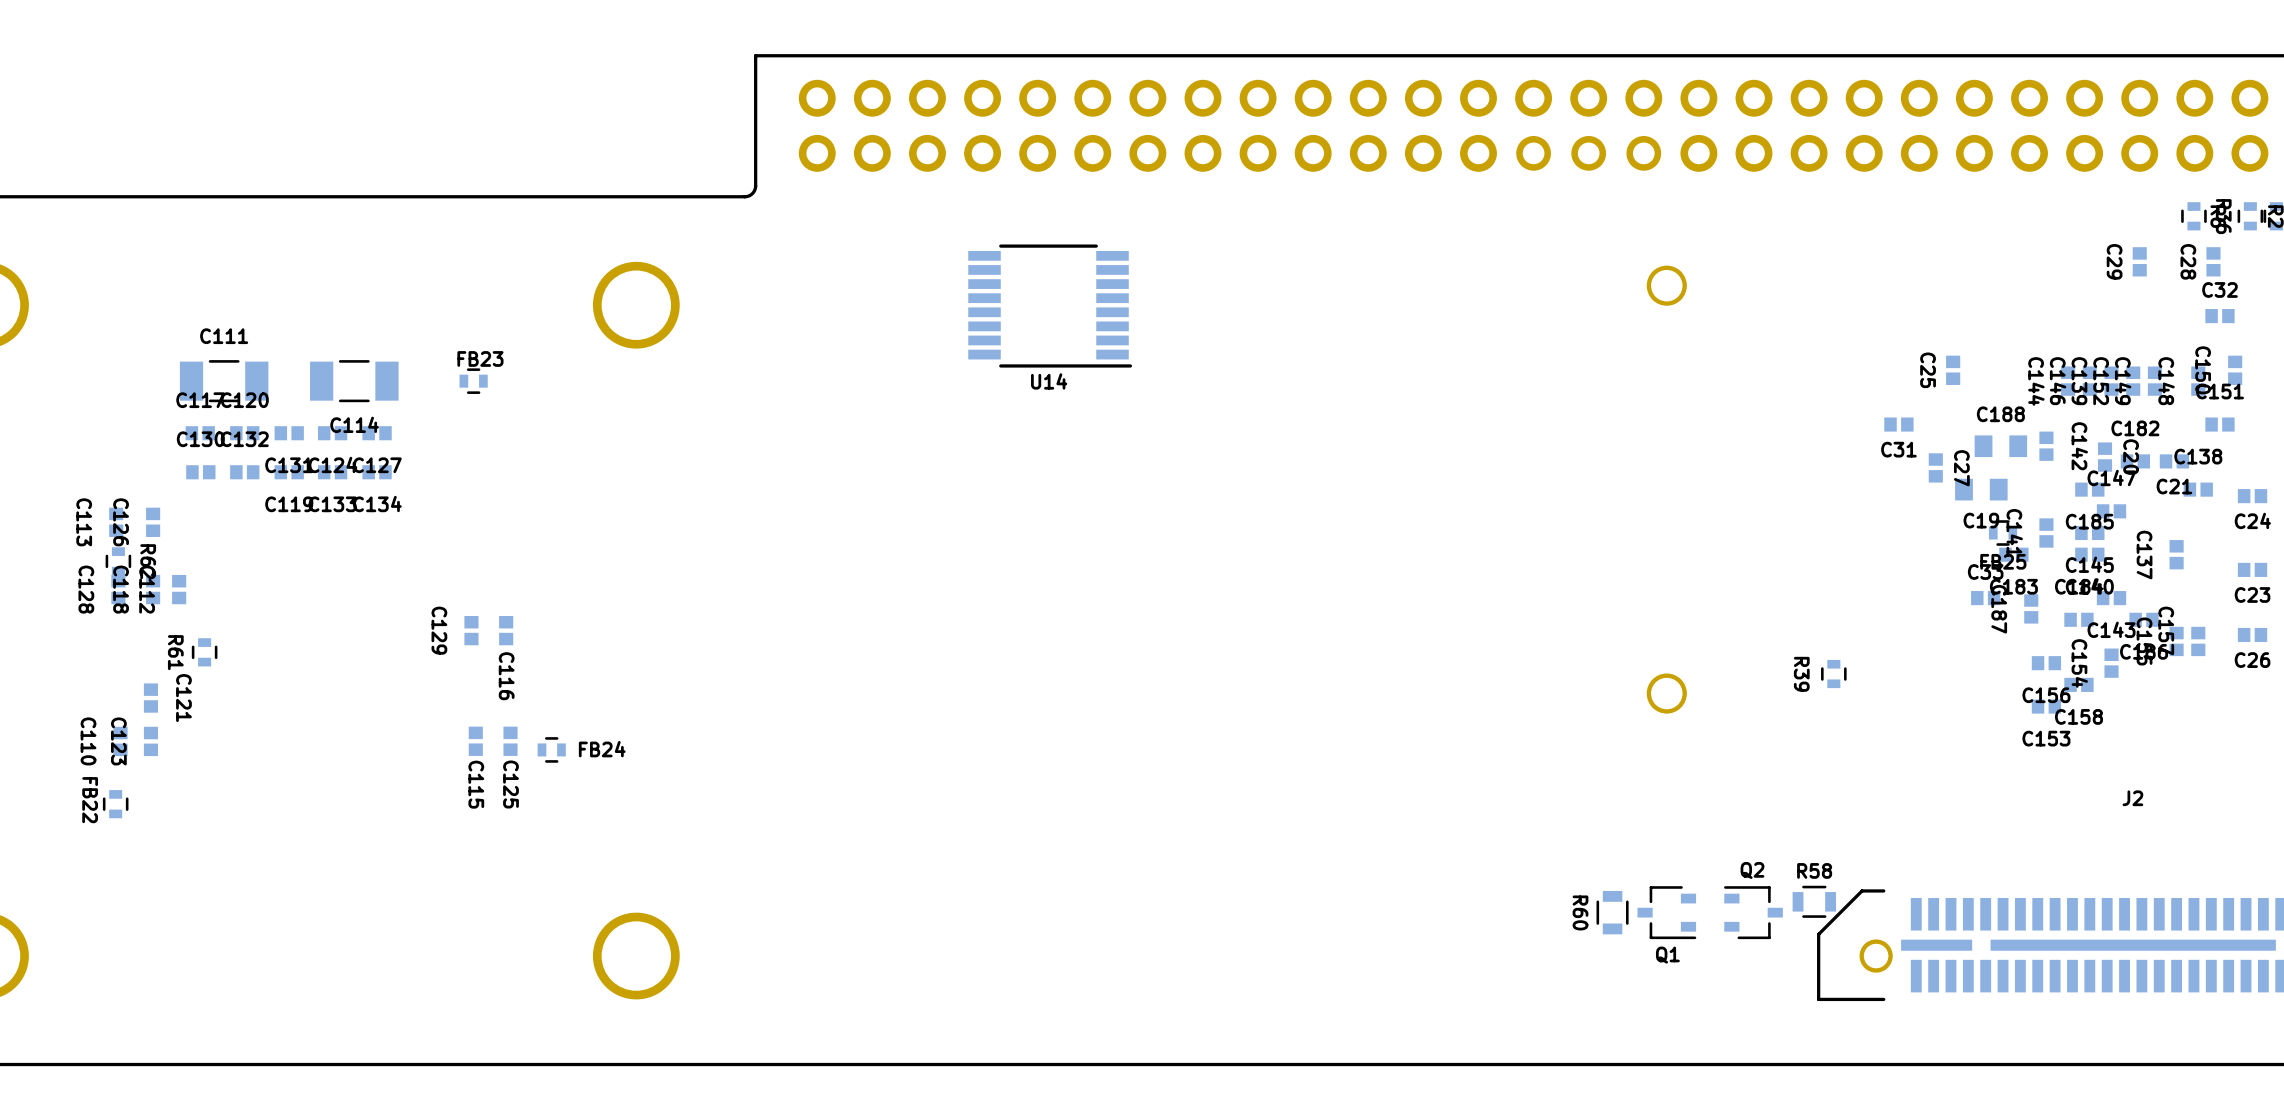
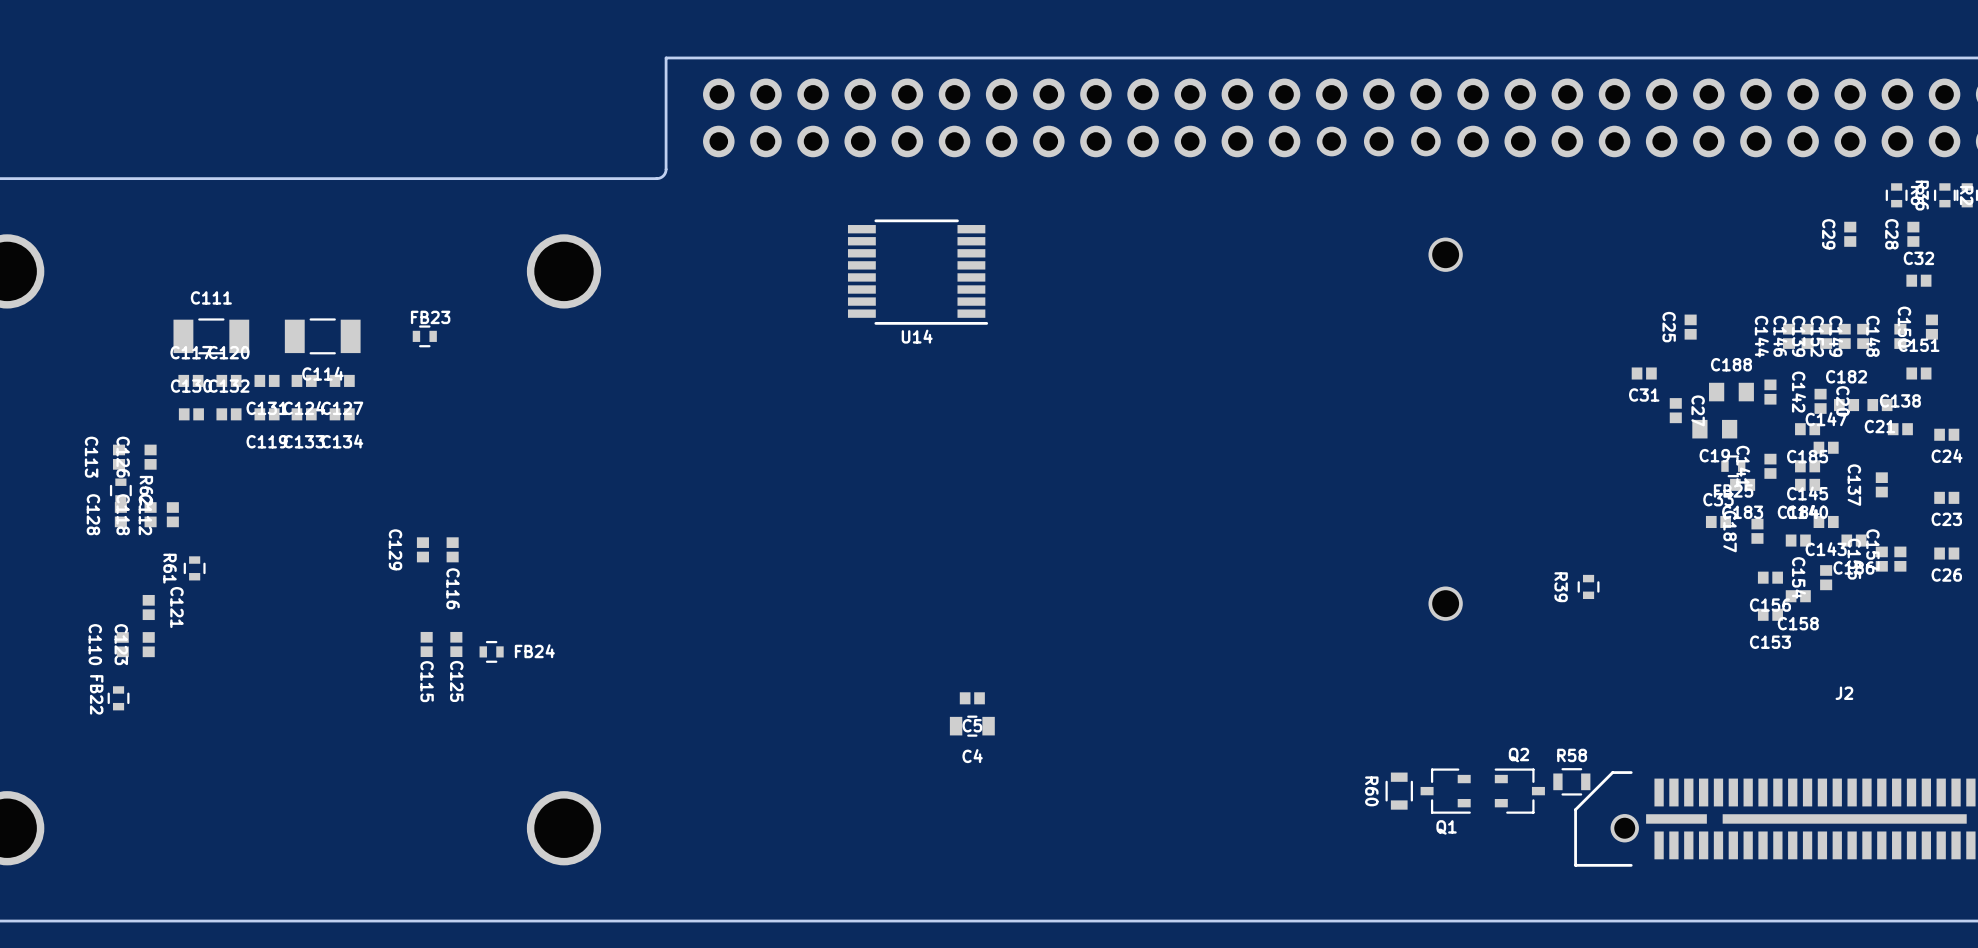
C5: none -> (972, 698)
C4: none -> (972, 726)

